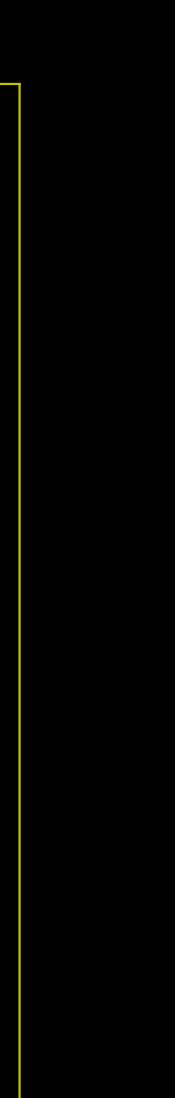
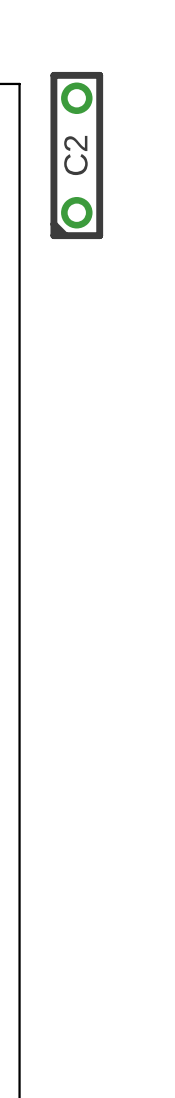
C2: none -> (76, 155)

